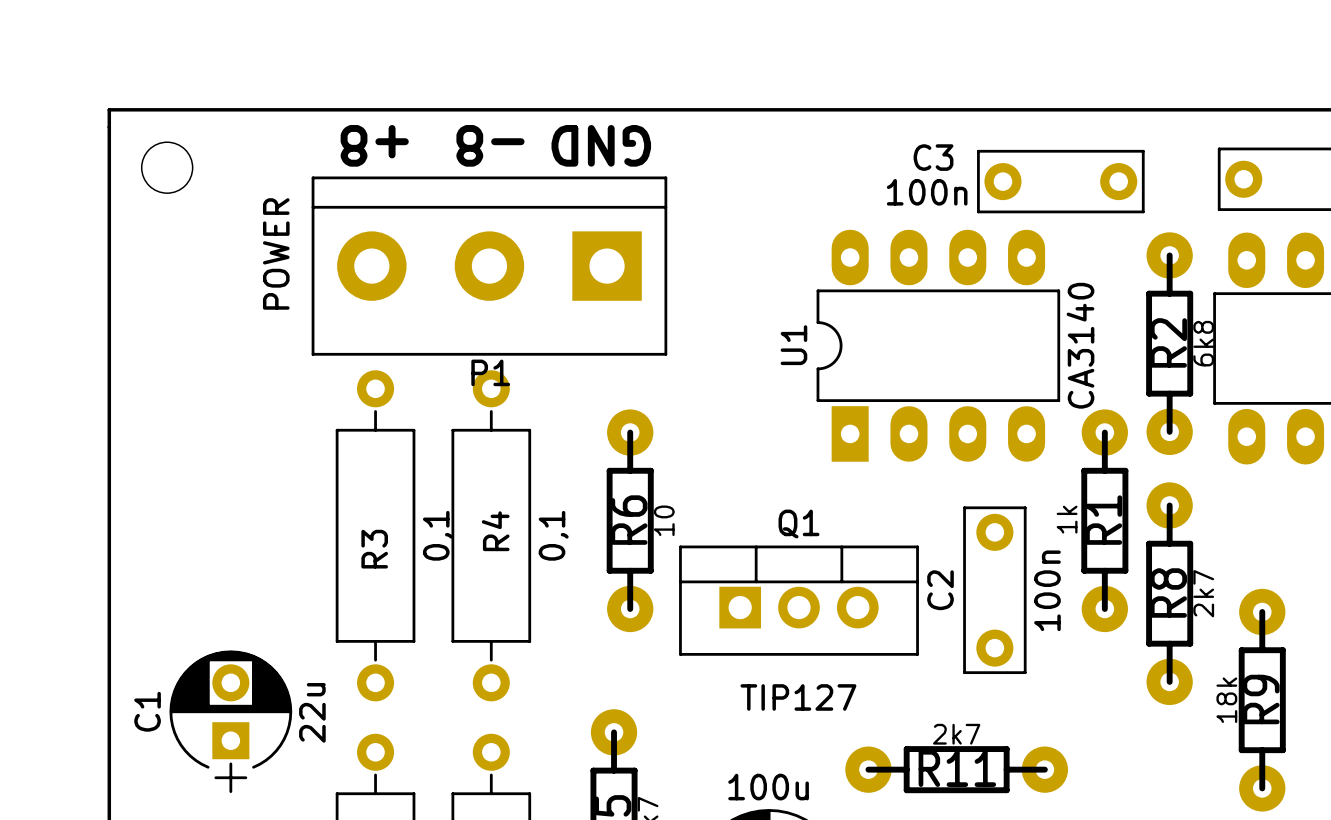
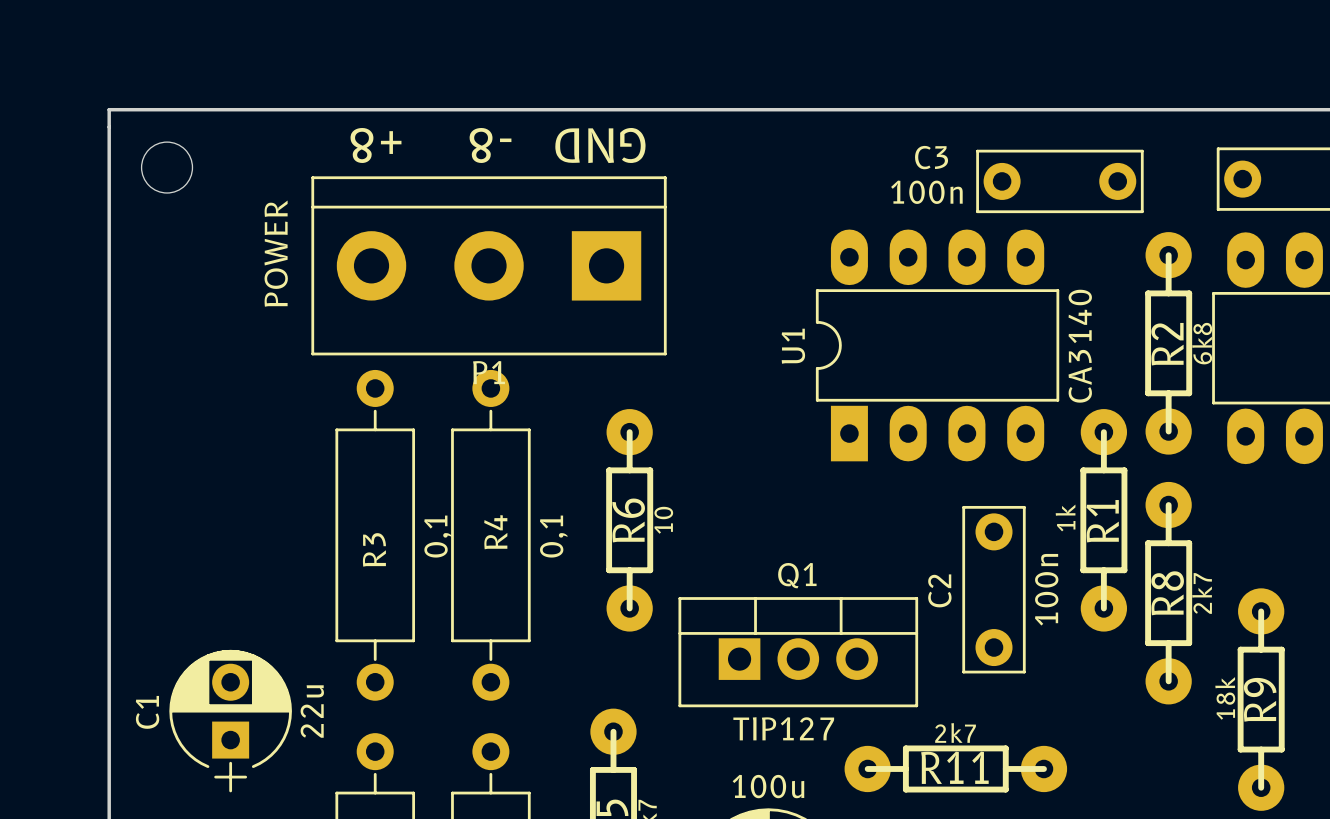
Q1 position: (798, 600) -> (798, 652)
Q1 value position: TIP127 (798, 697) -> TIP127 (783, 728)

